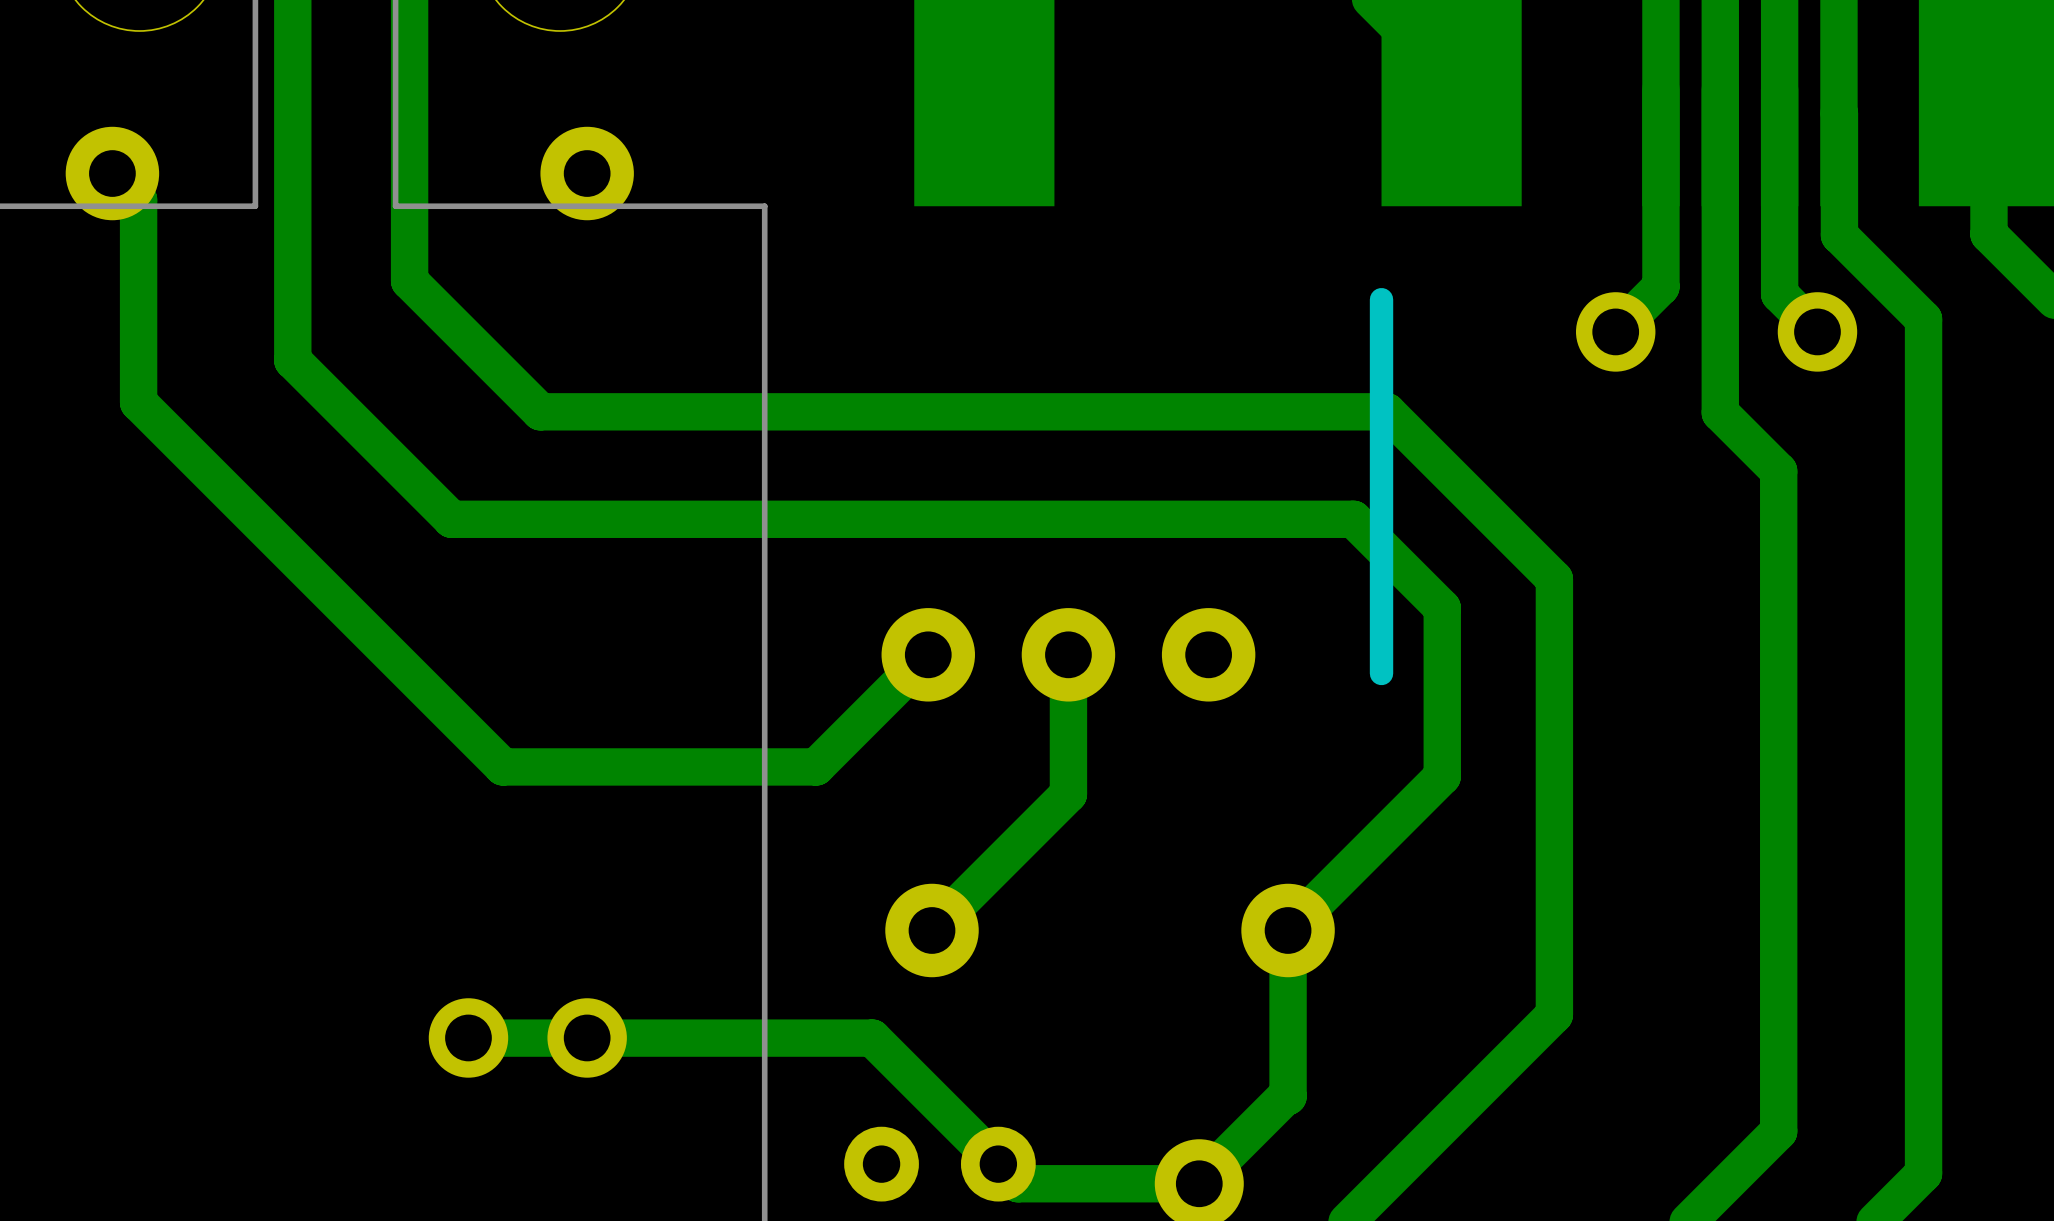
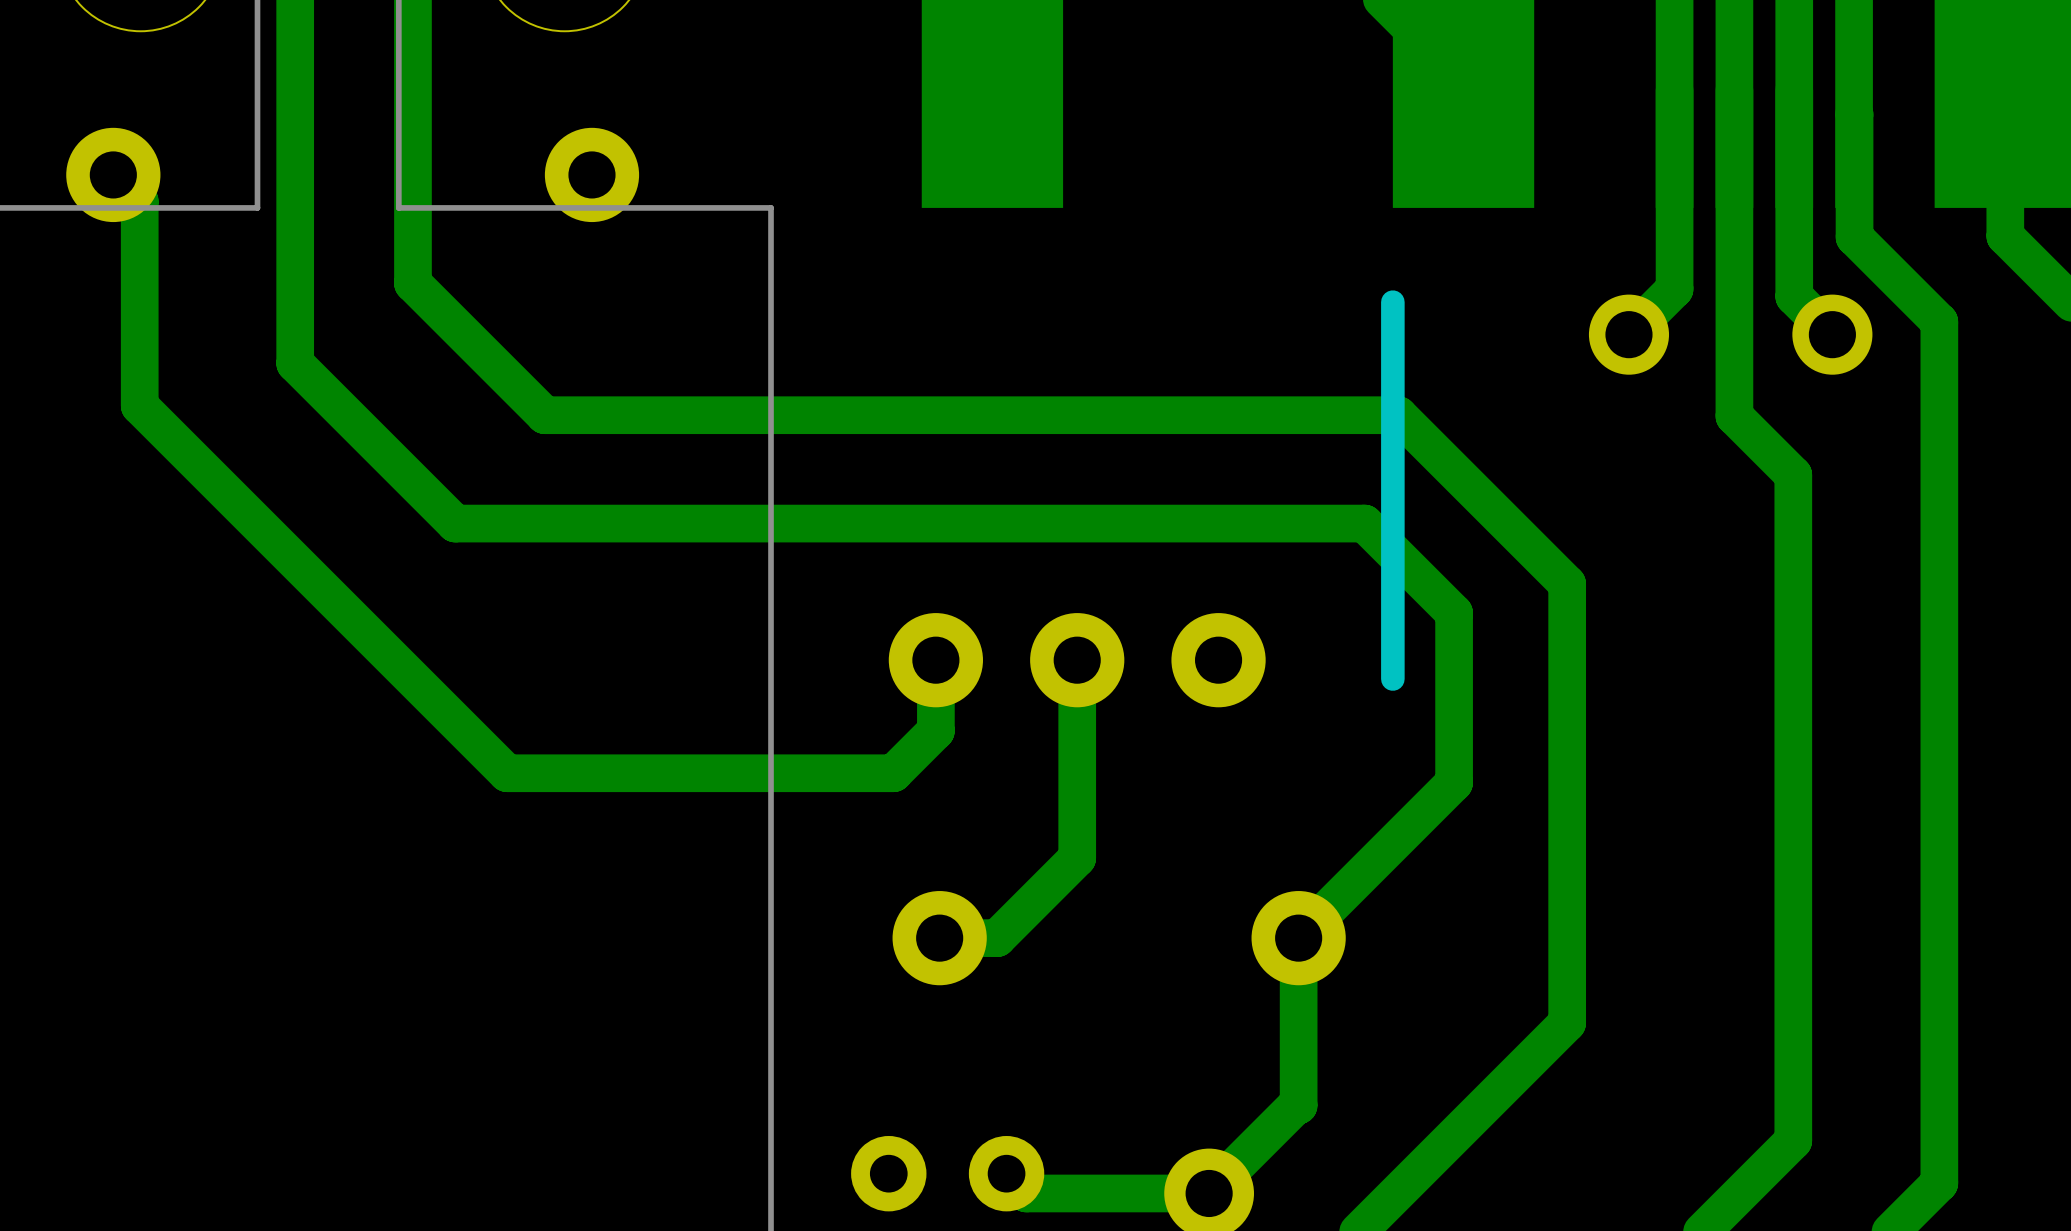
bottom track: (928, 654) (816, 766) -> (935, 660) (935, 730) (893, 773) (822, 773)
bottom track: (1068, 794) (932, 930) -> (1077, 800) (1077, 858) (997, 938) (939, 938)
part: (527, 1037) -> none
bottom track: (476, 1038) (872, 1038) (998, 1164) -> none

